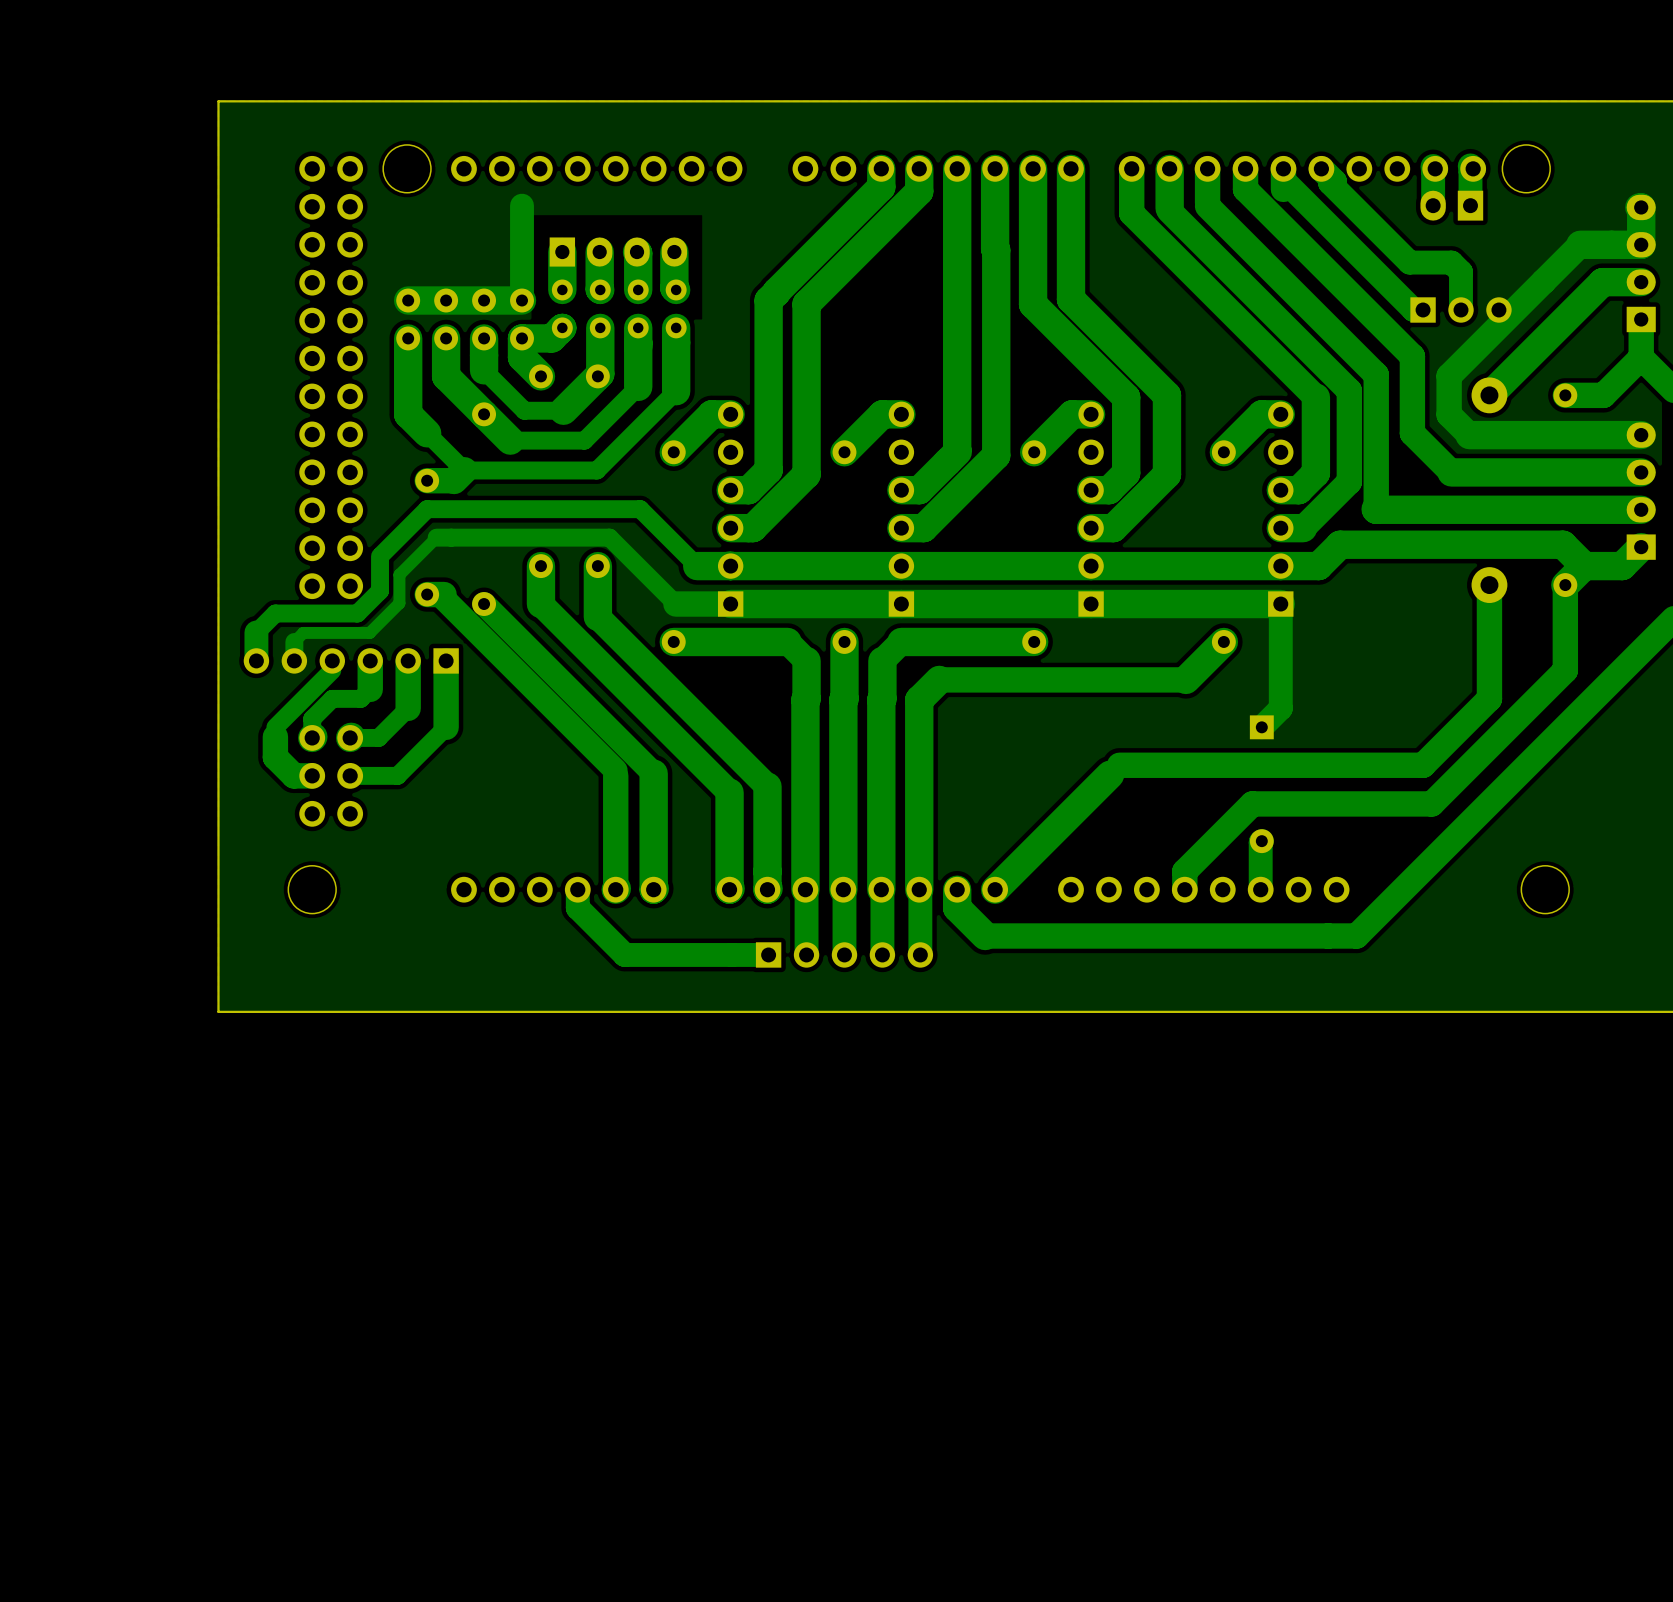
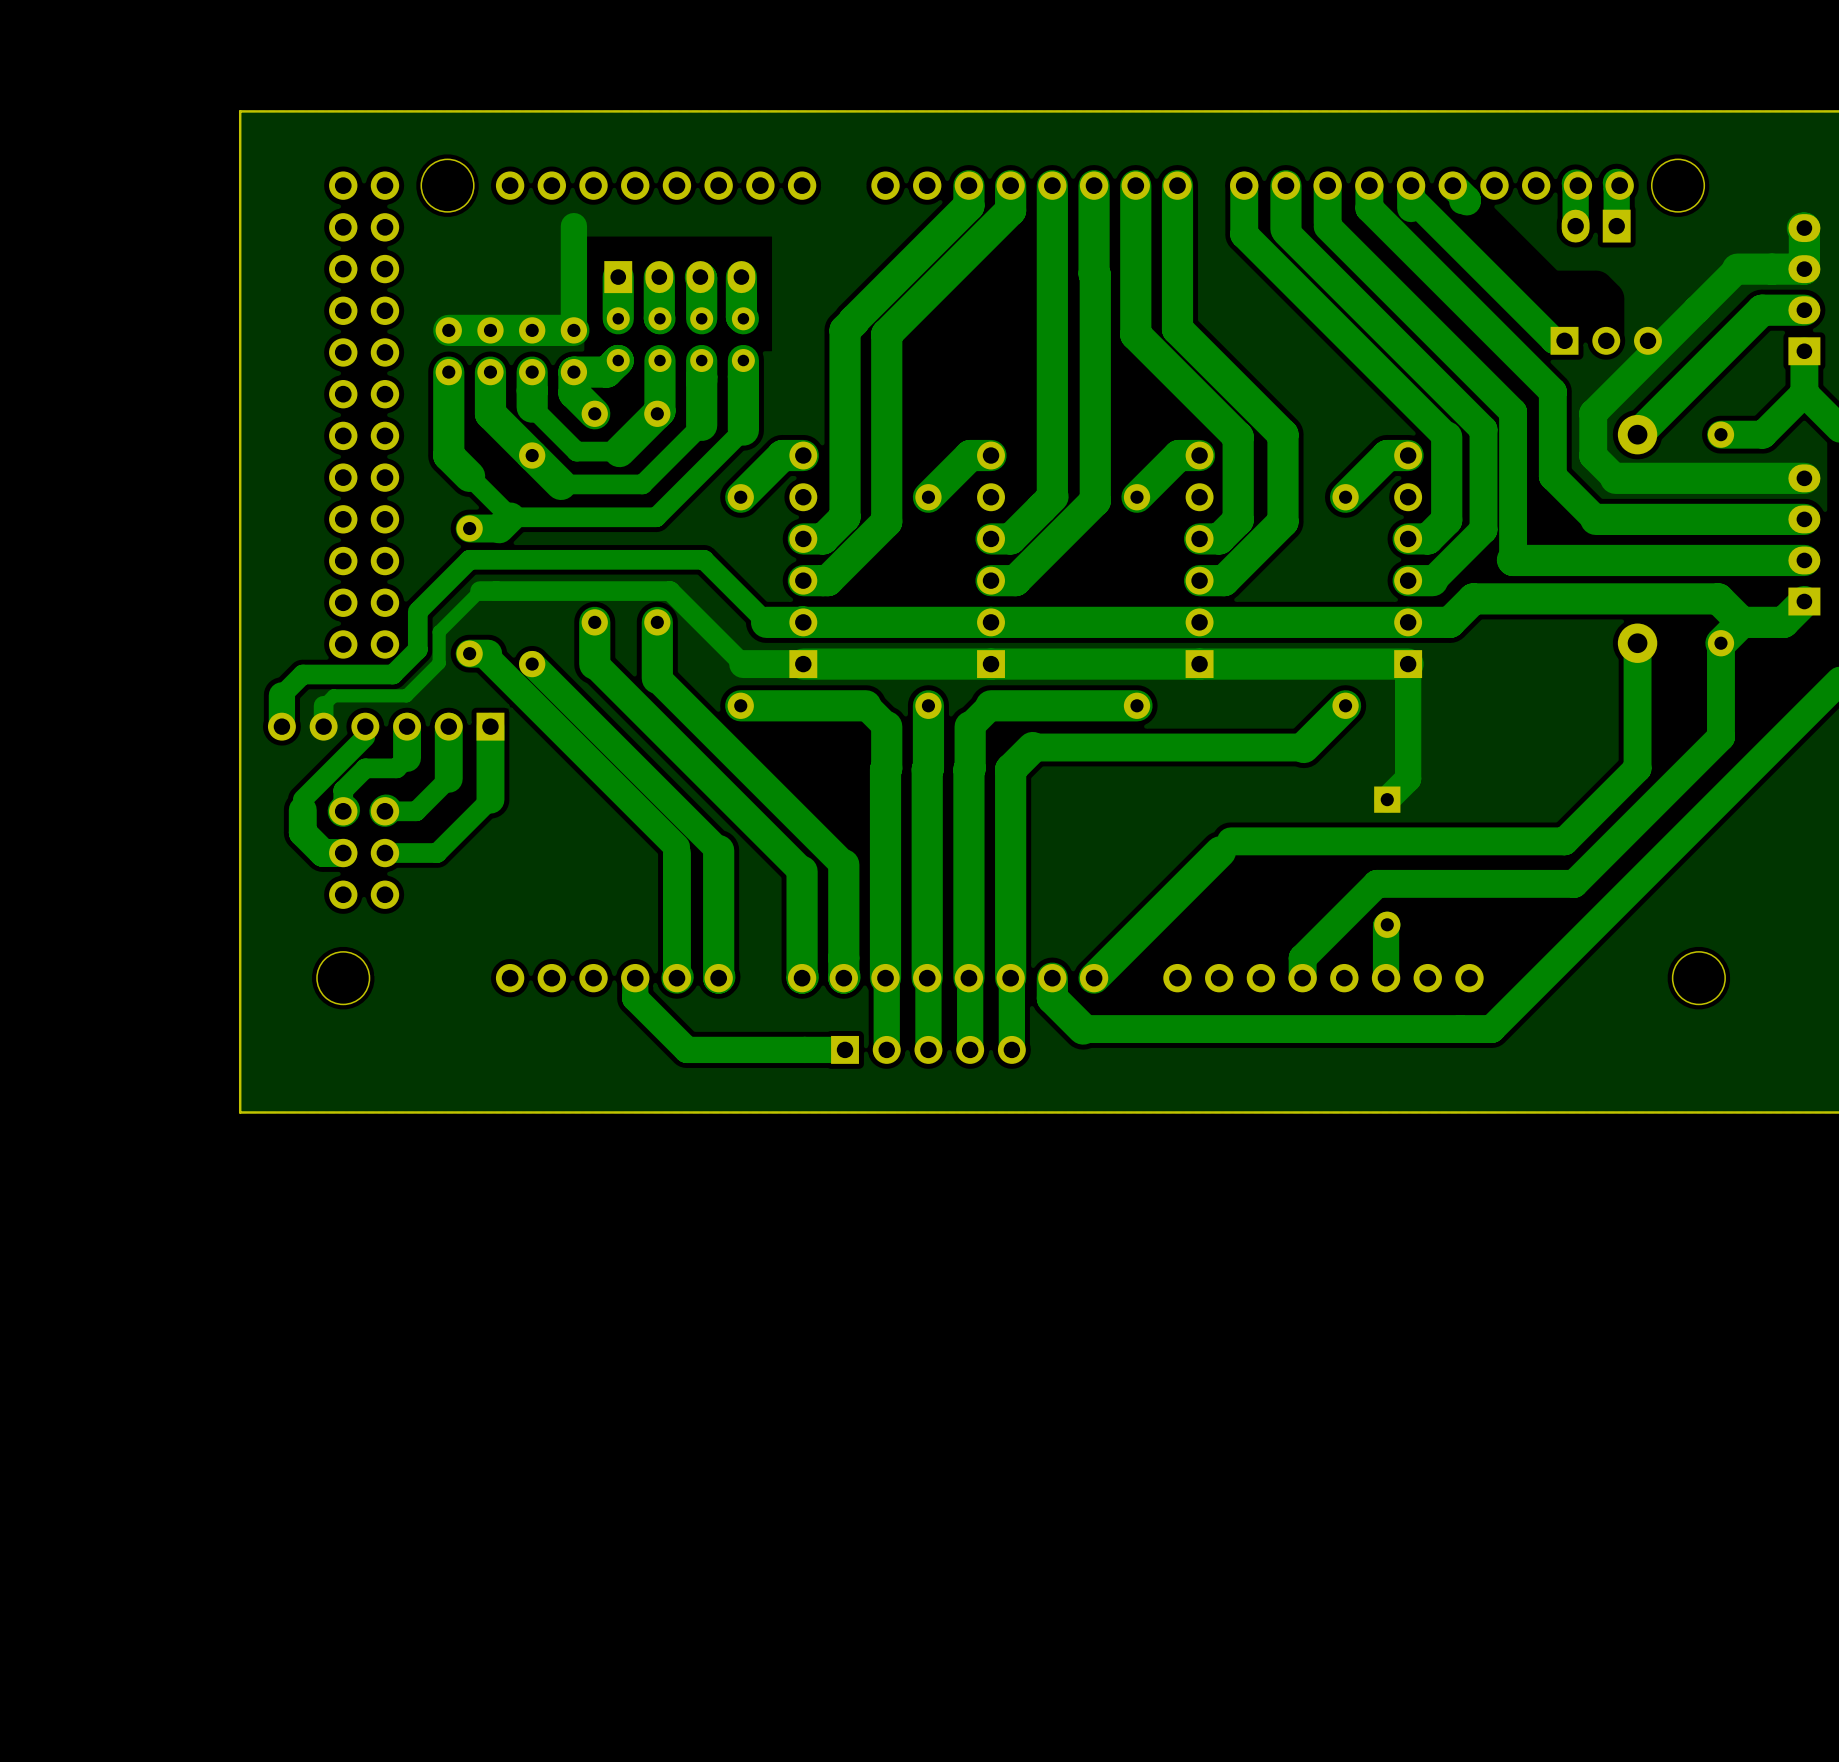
bottom track: (1330, 182) (1409, 262) (1451, 262) (1461, 272) (1461, 310) -> none

